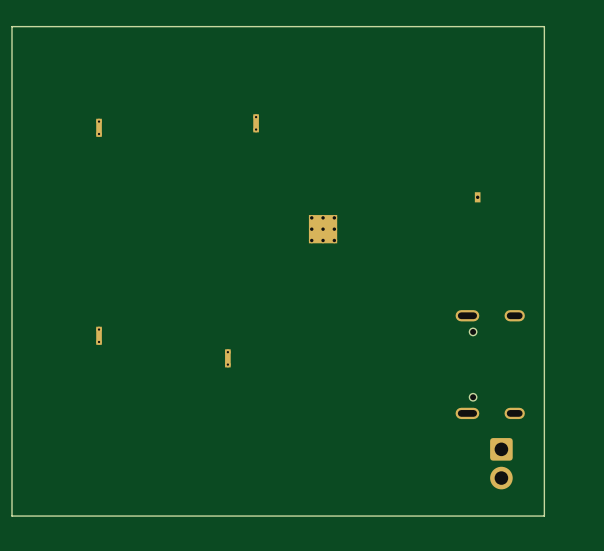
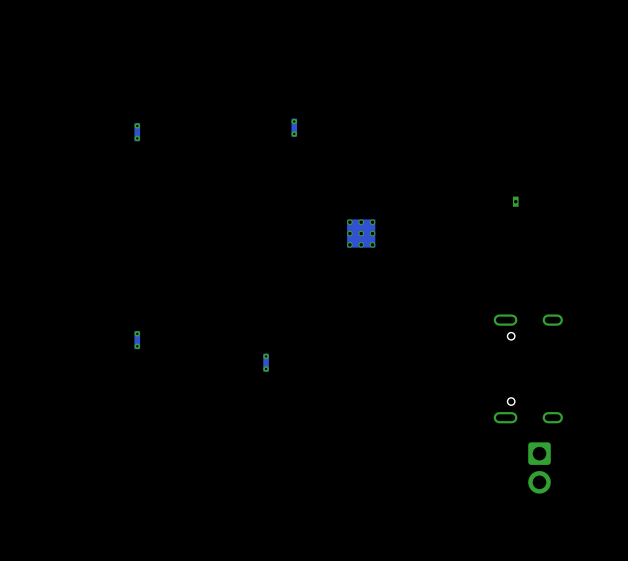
board edge: (544, 26) (12, 26) (12, 516) (544, 516) (544, 26) -> none

